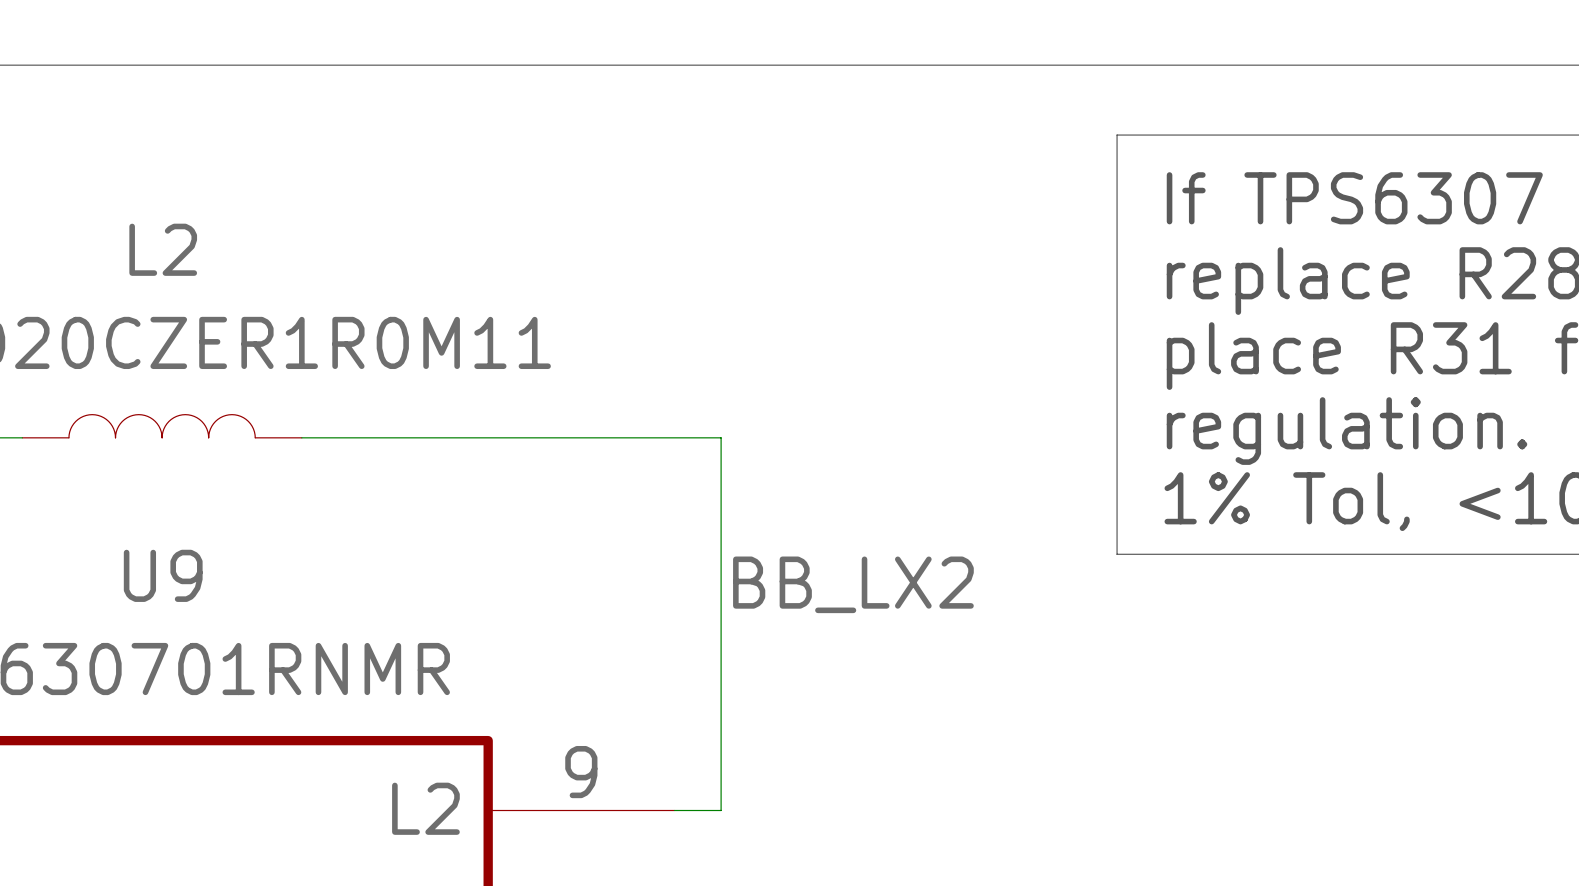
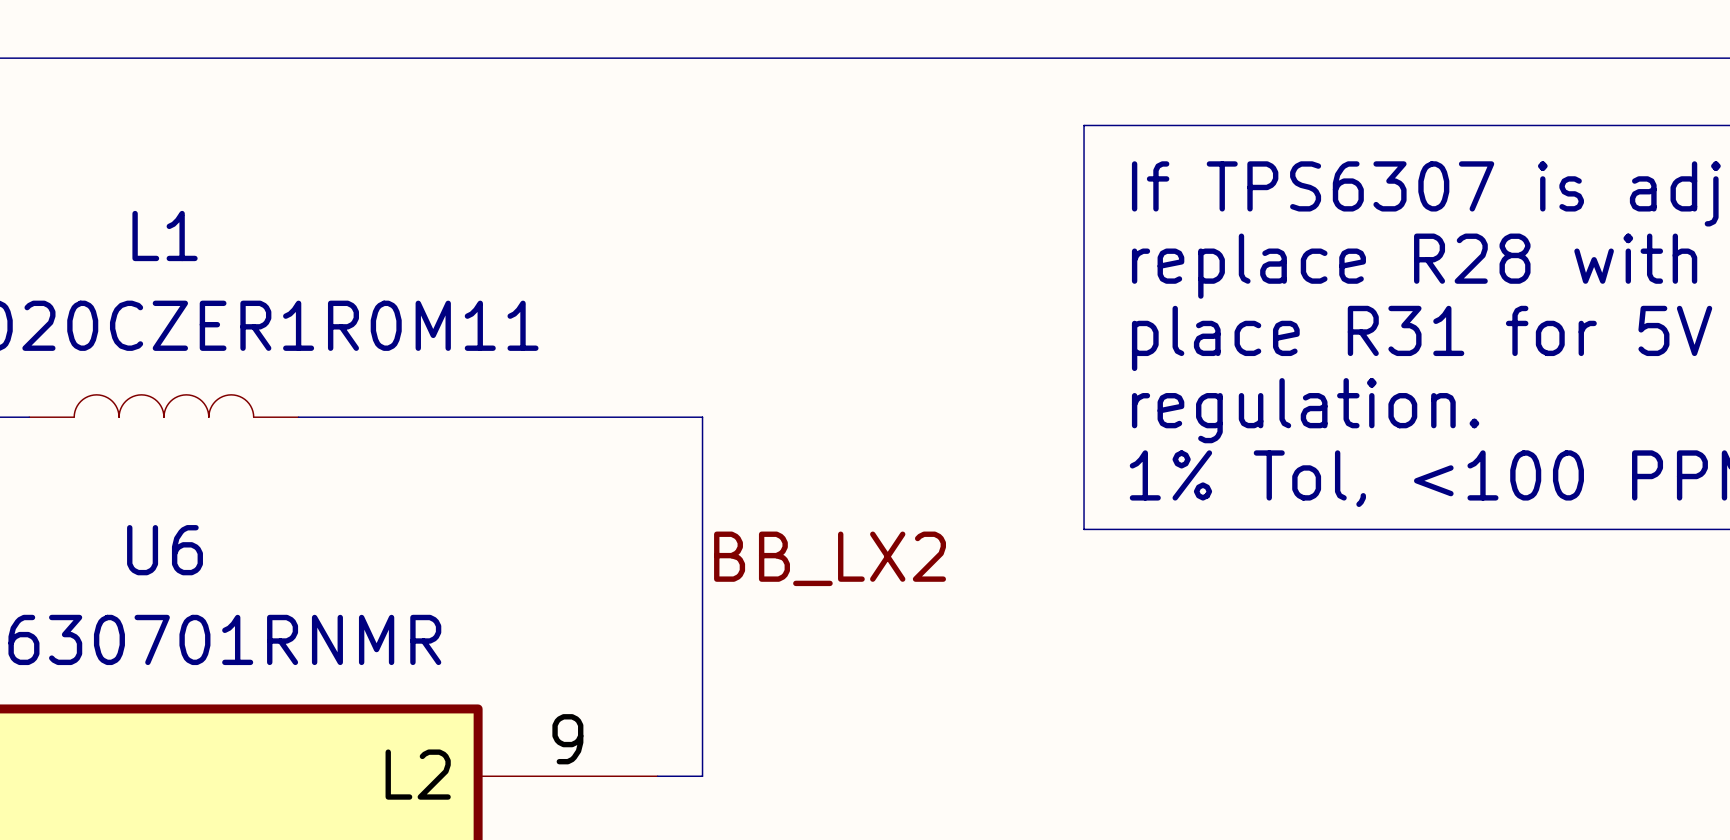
L2 name: L2 (163, 249) -> L1 (165, 236)
U9 name: U9 (163, 575) -> U6 (165, 550)

